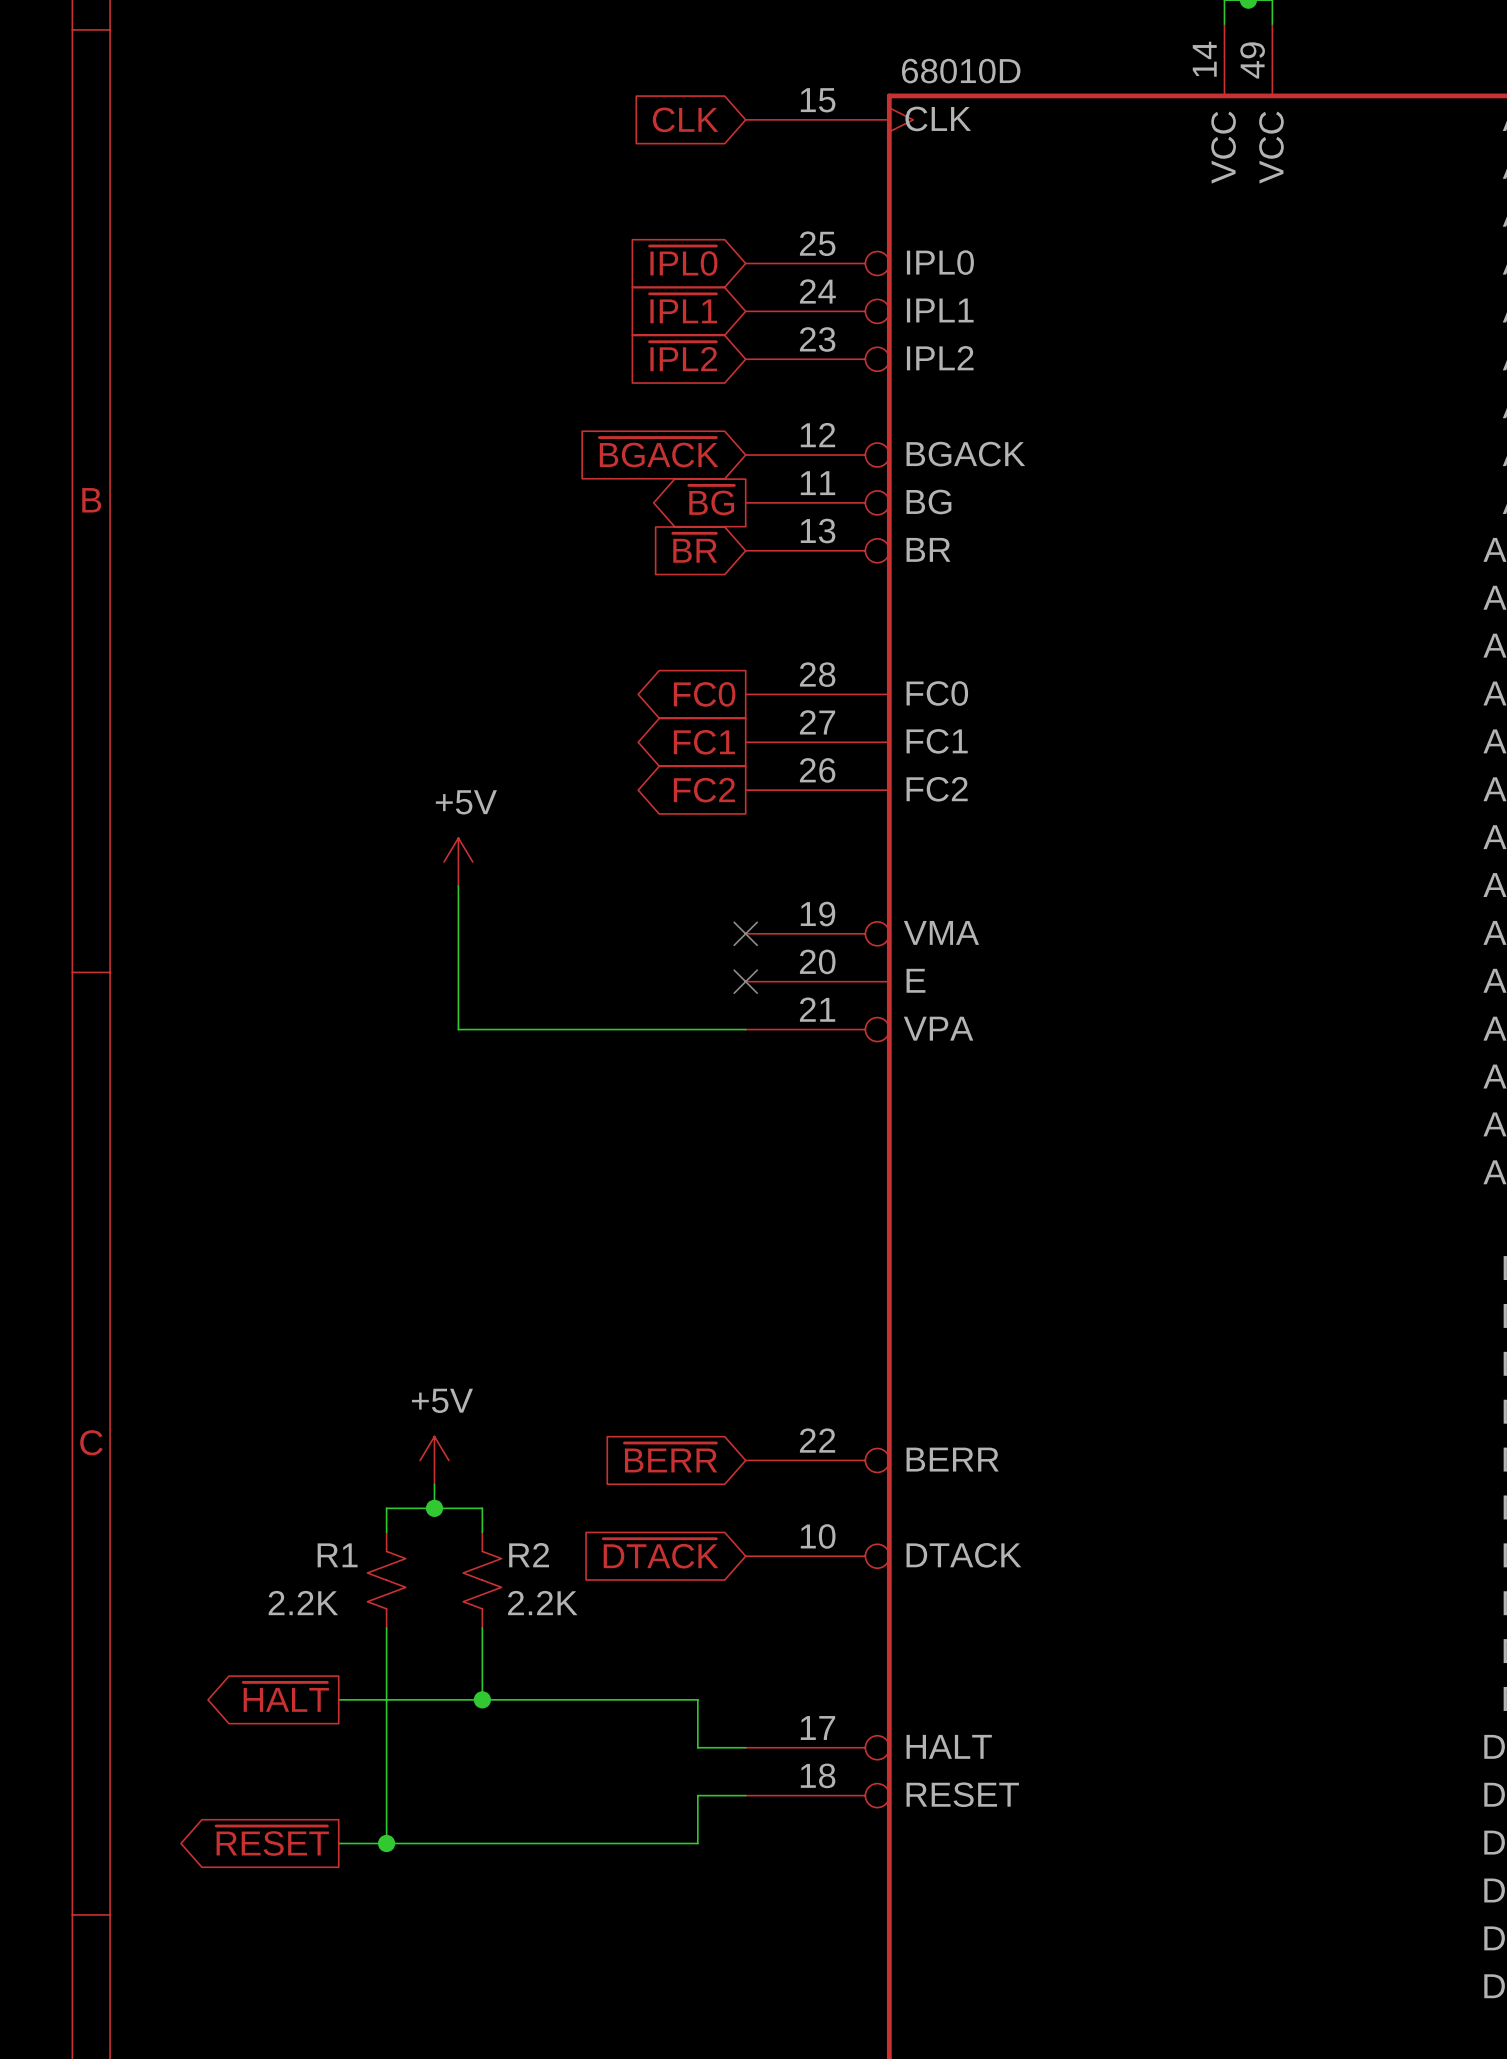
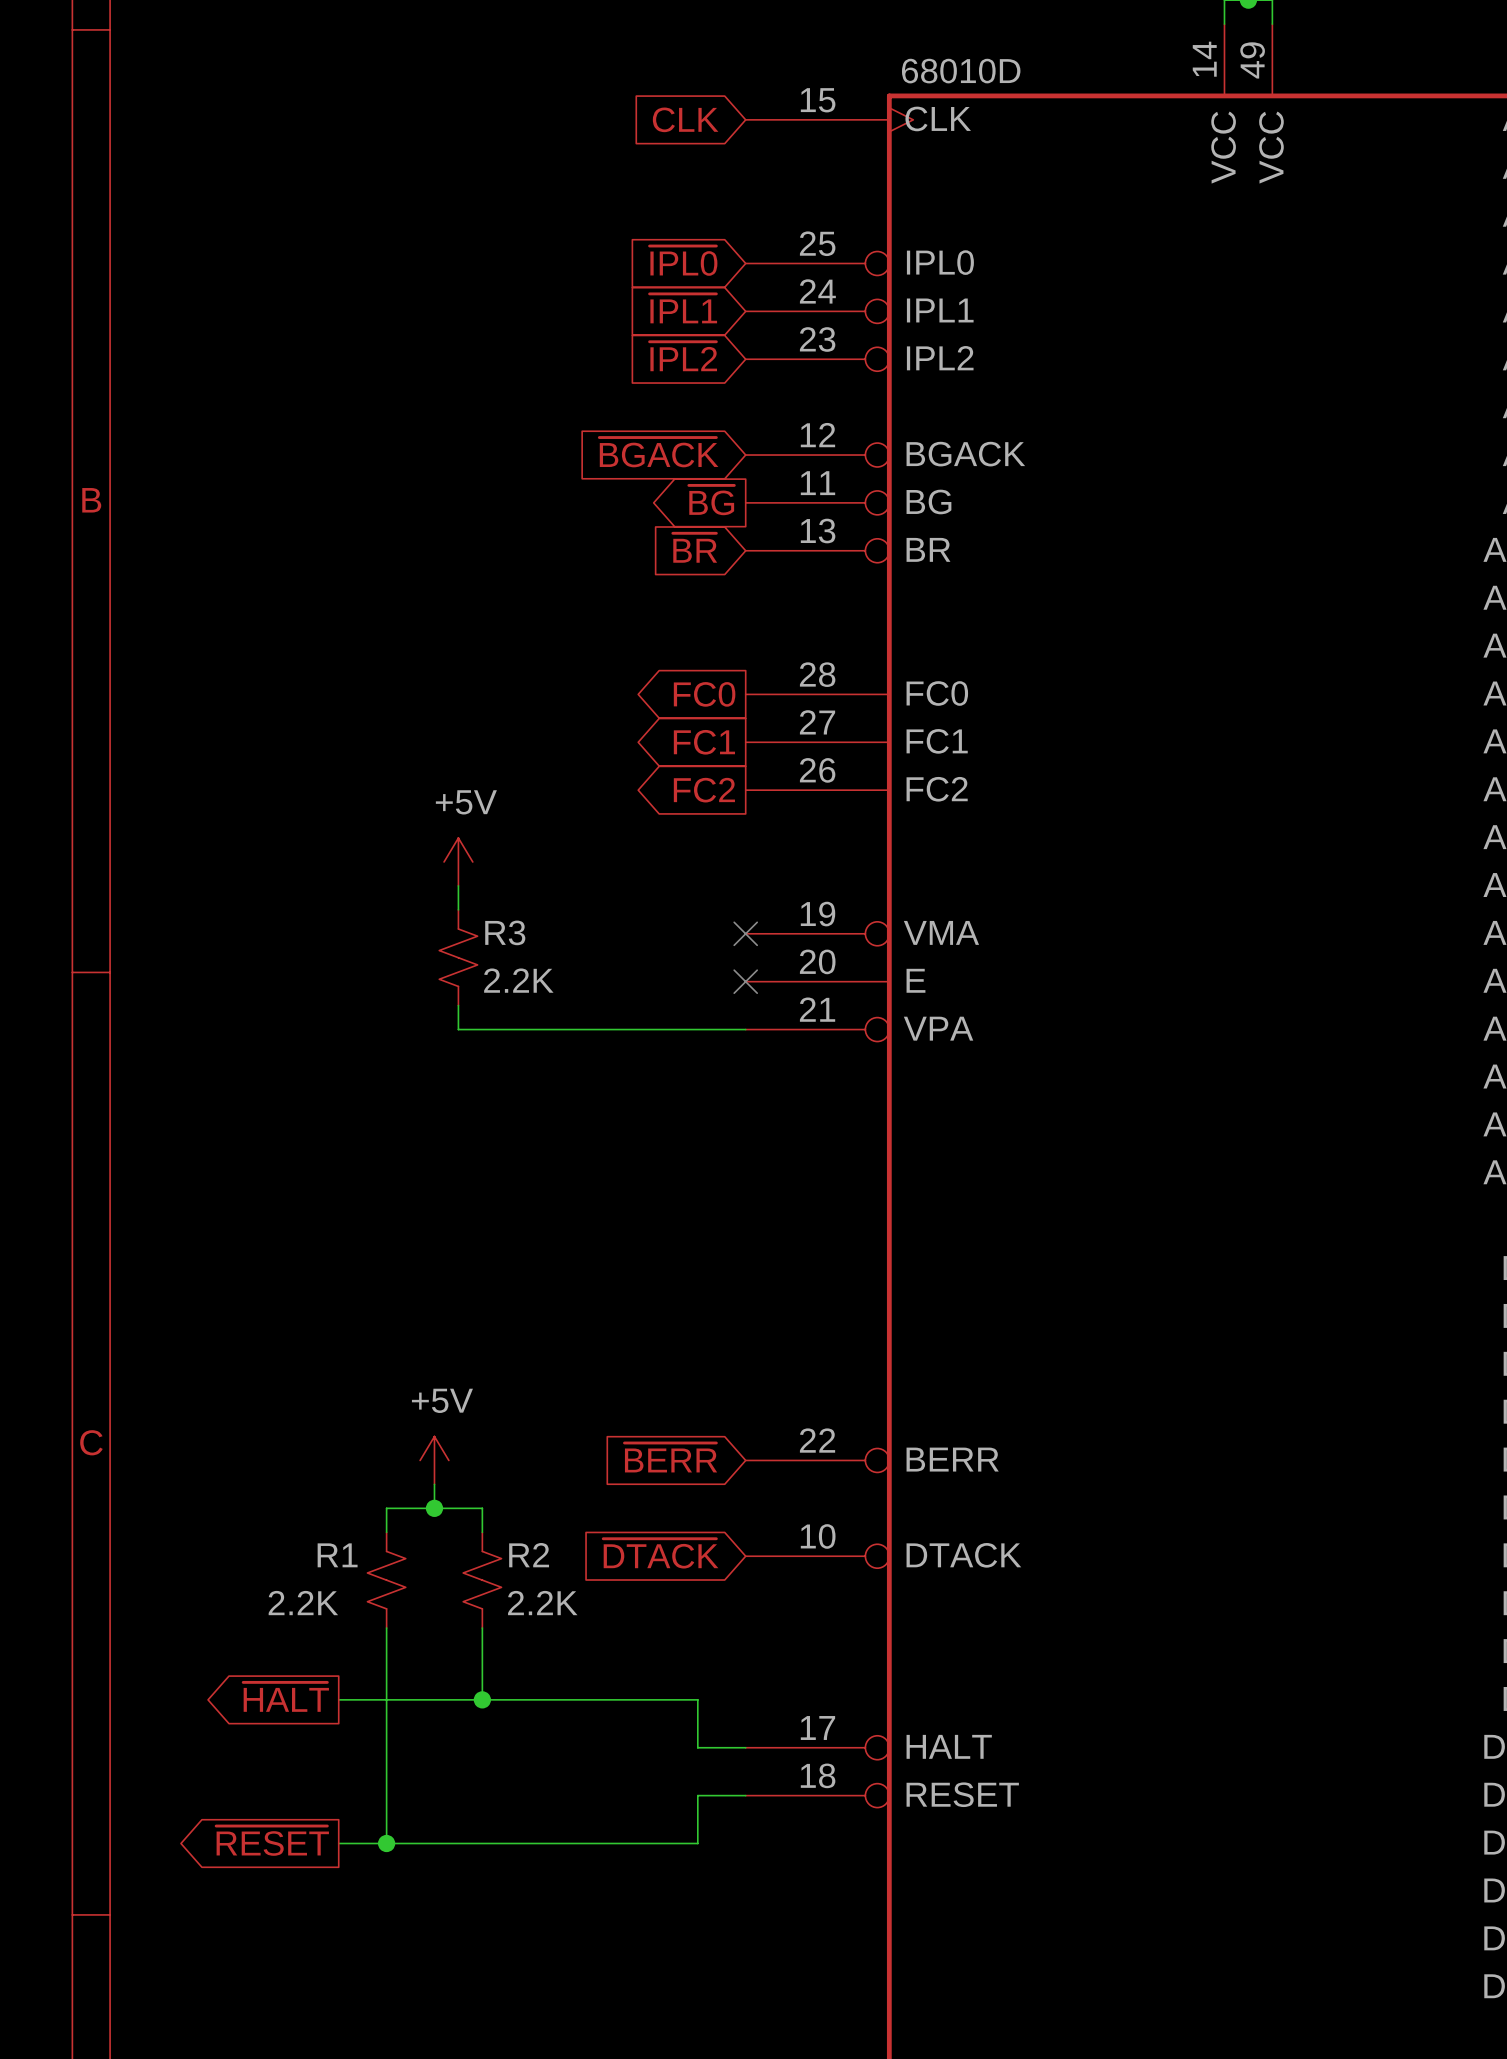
wire: (458, 909) (458, 1005) -> none
R3: none -> 2.2K (458, 957)

